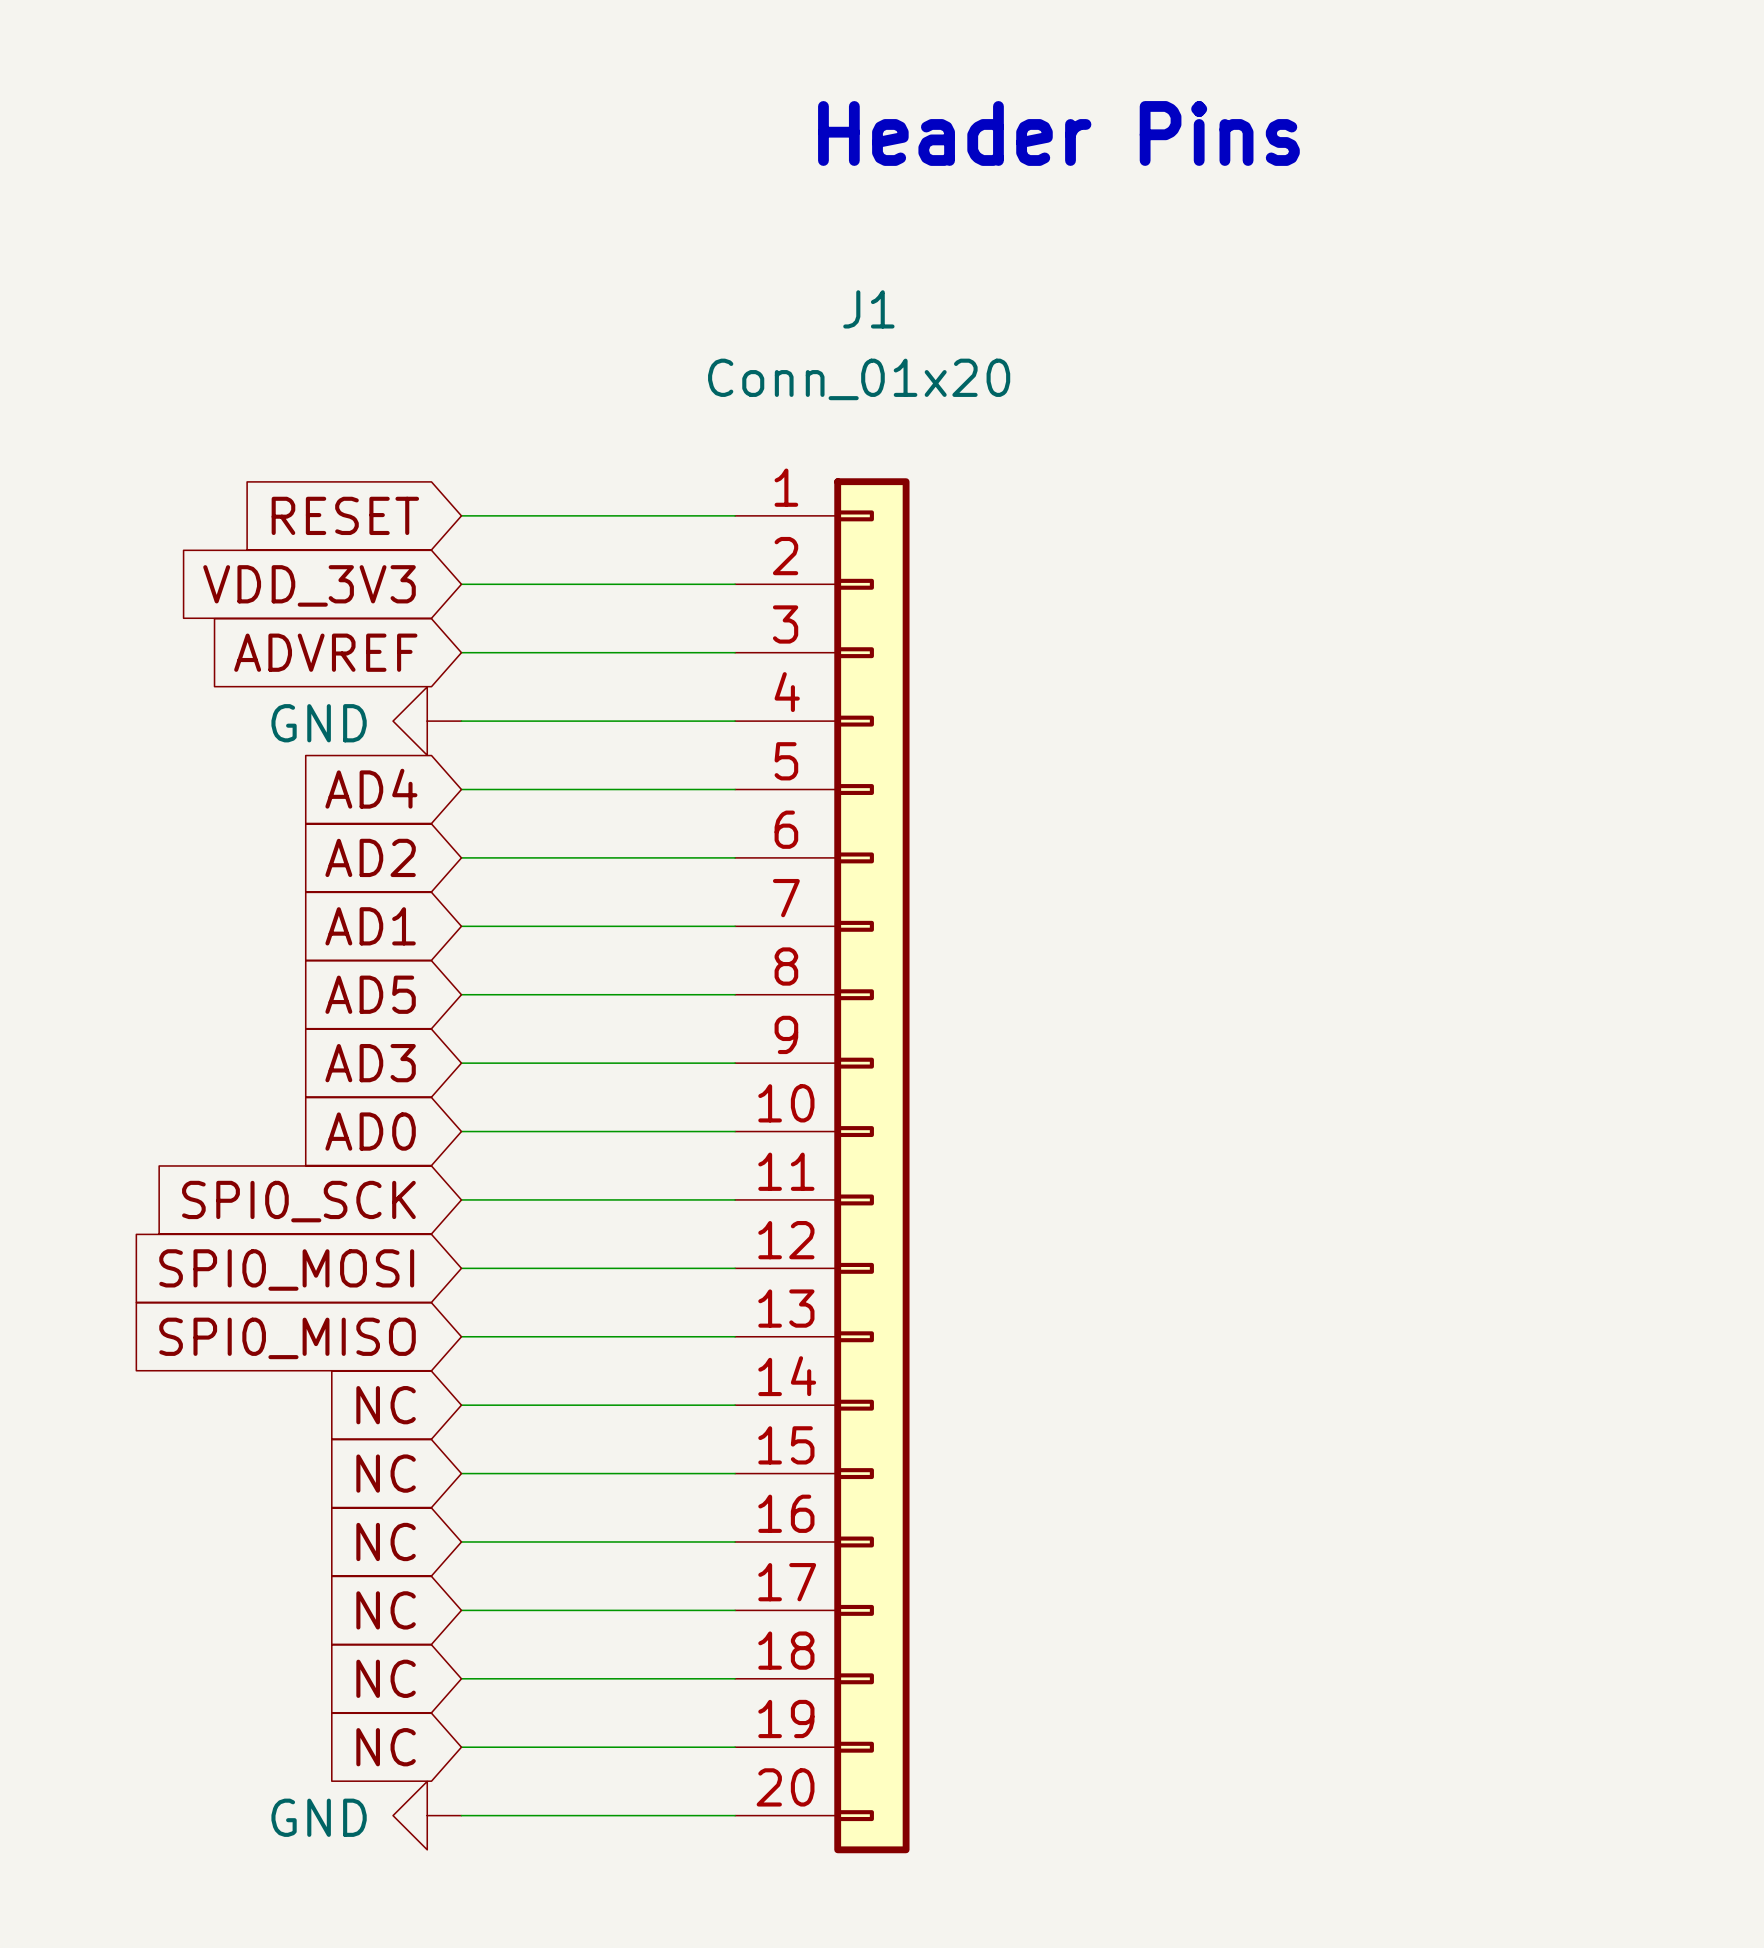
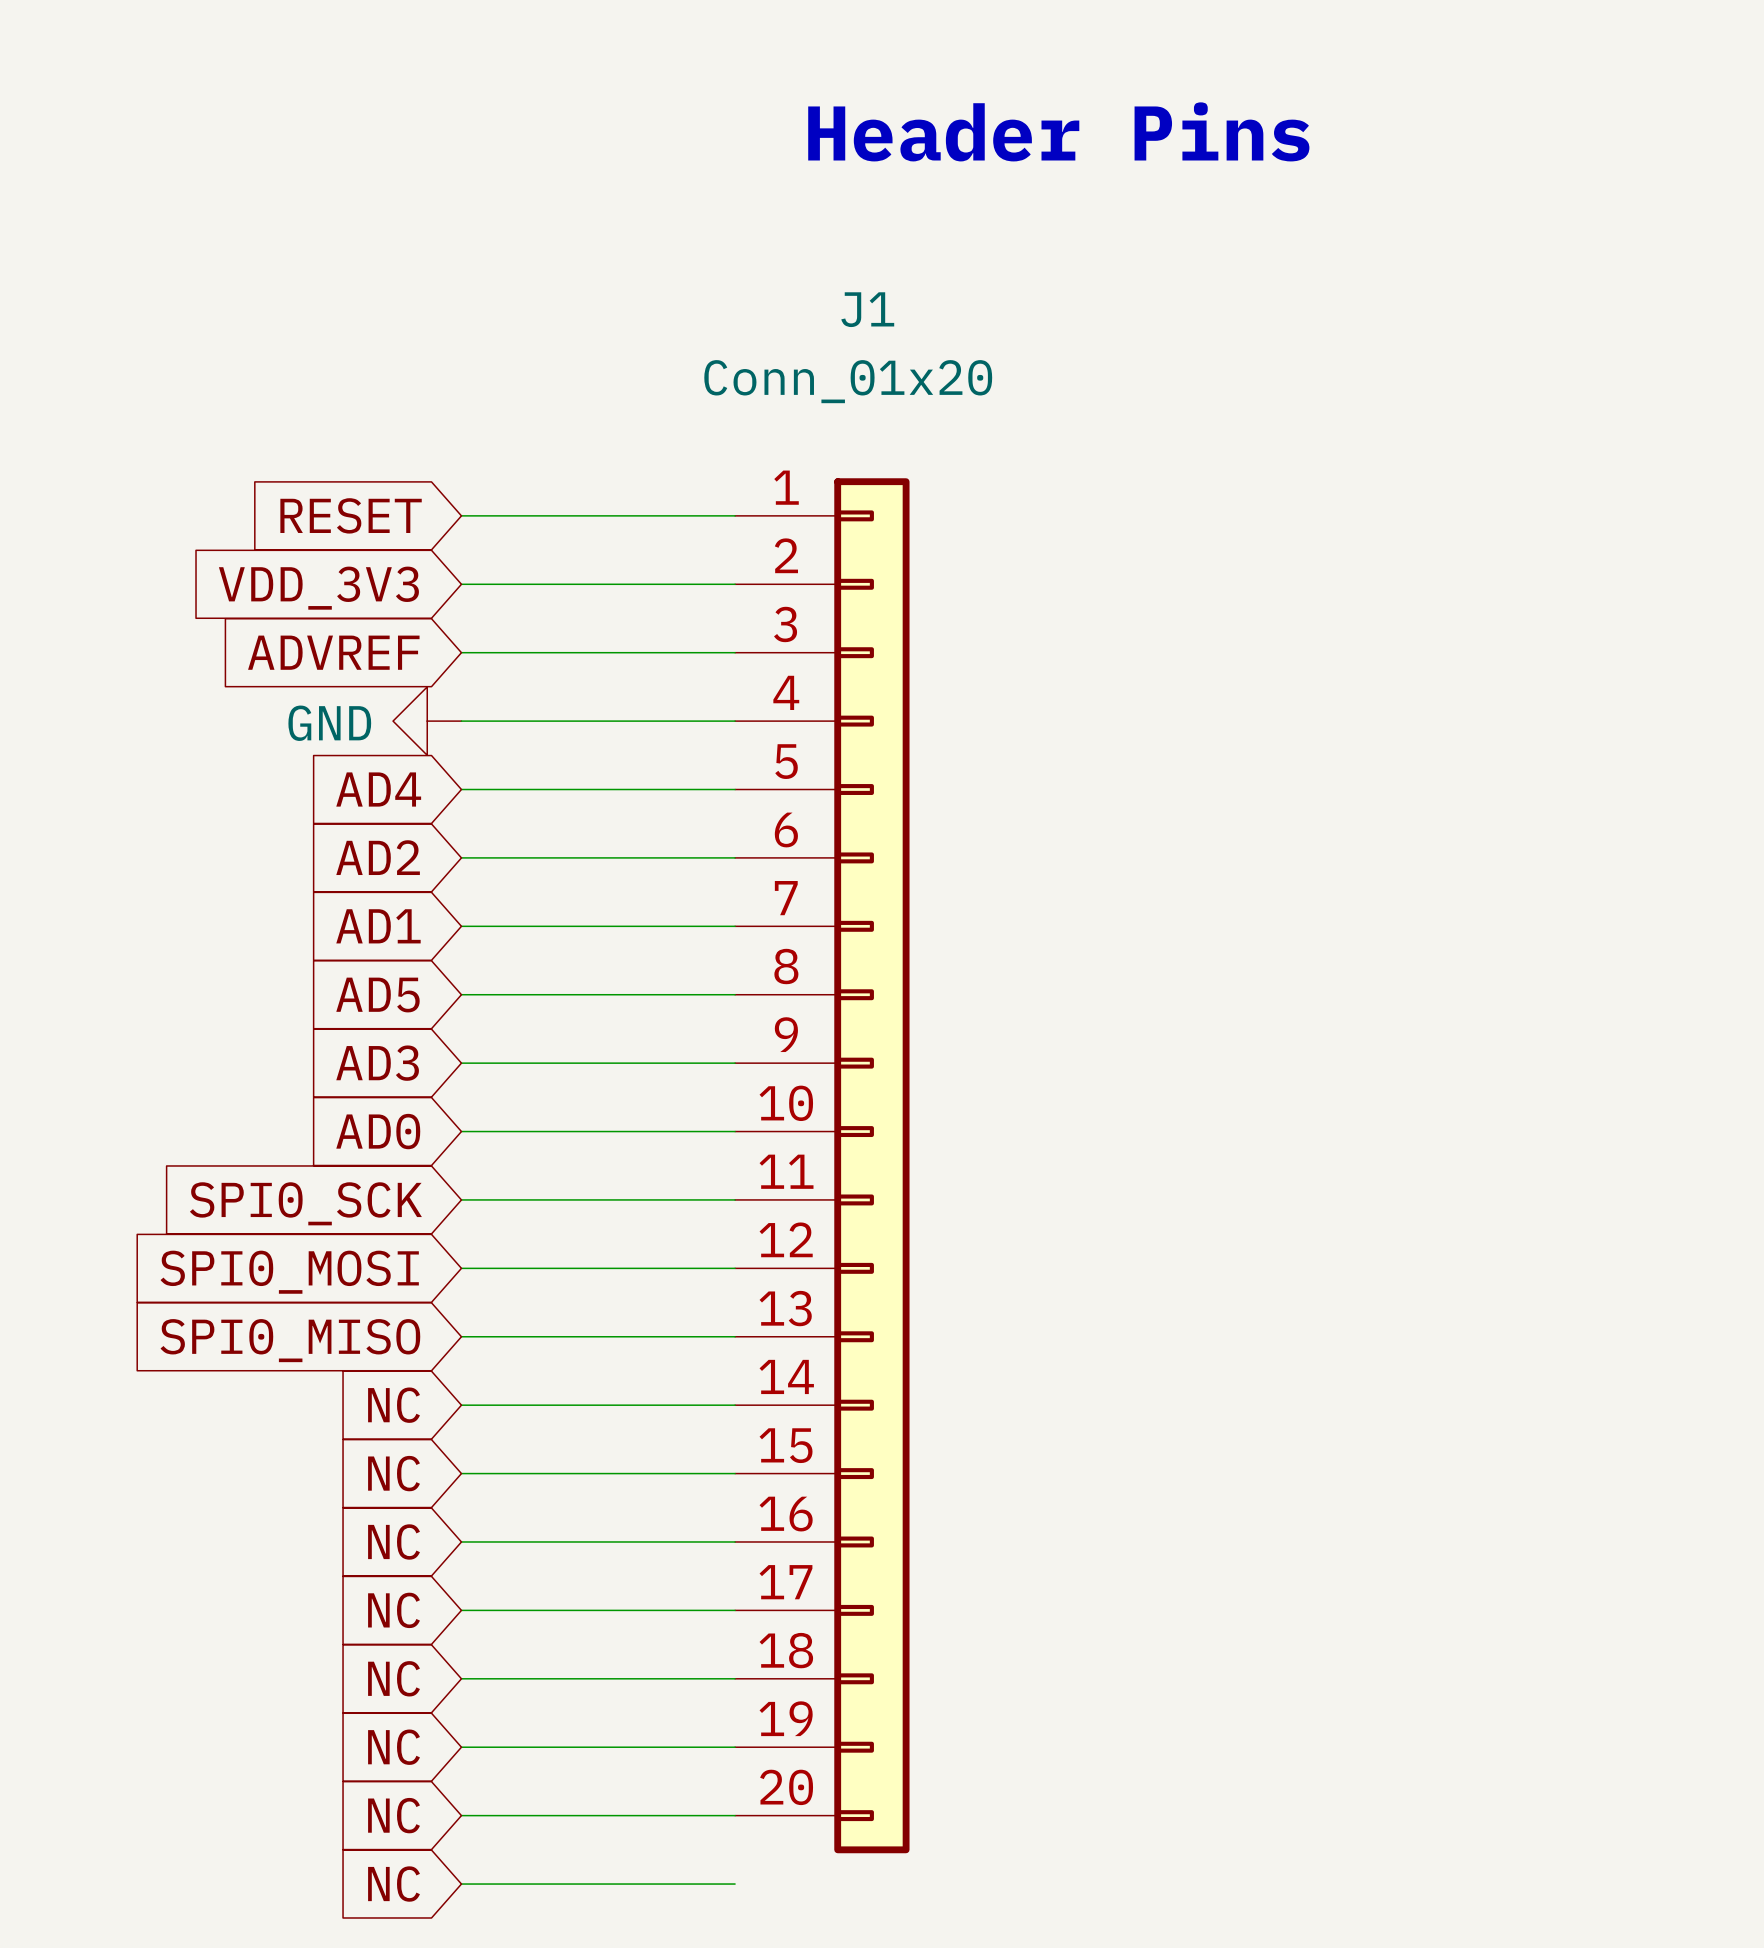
global label: none -> NC (394, 1815)
power symbol: GND (427, 1815) -> none
global label: none -> NC (394, 1884)
wire: none -> (461, 1884) (735, 1884)

